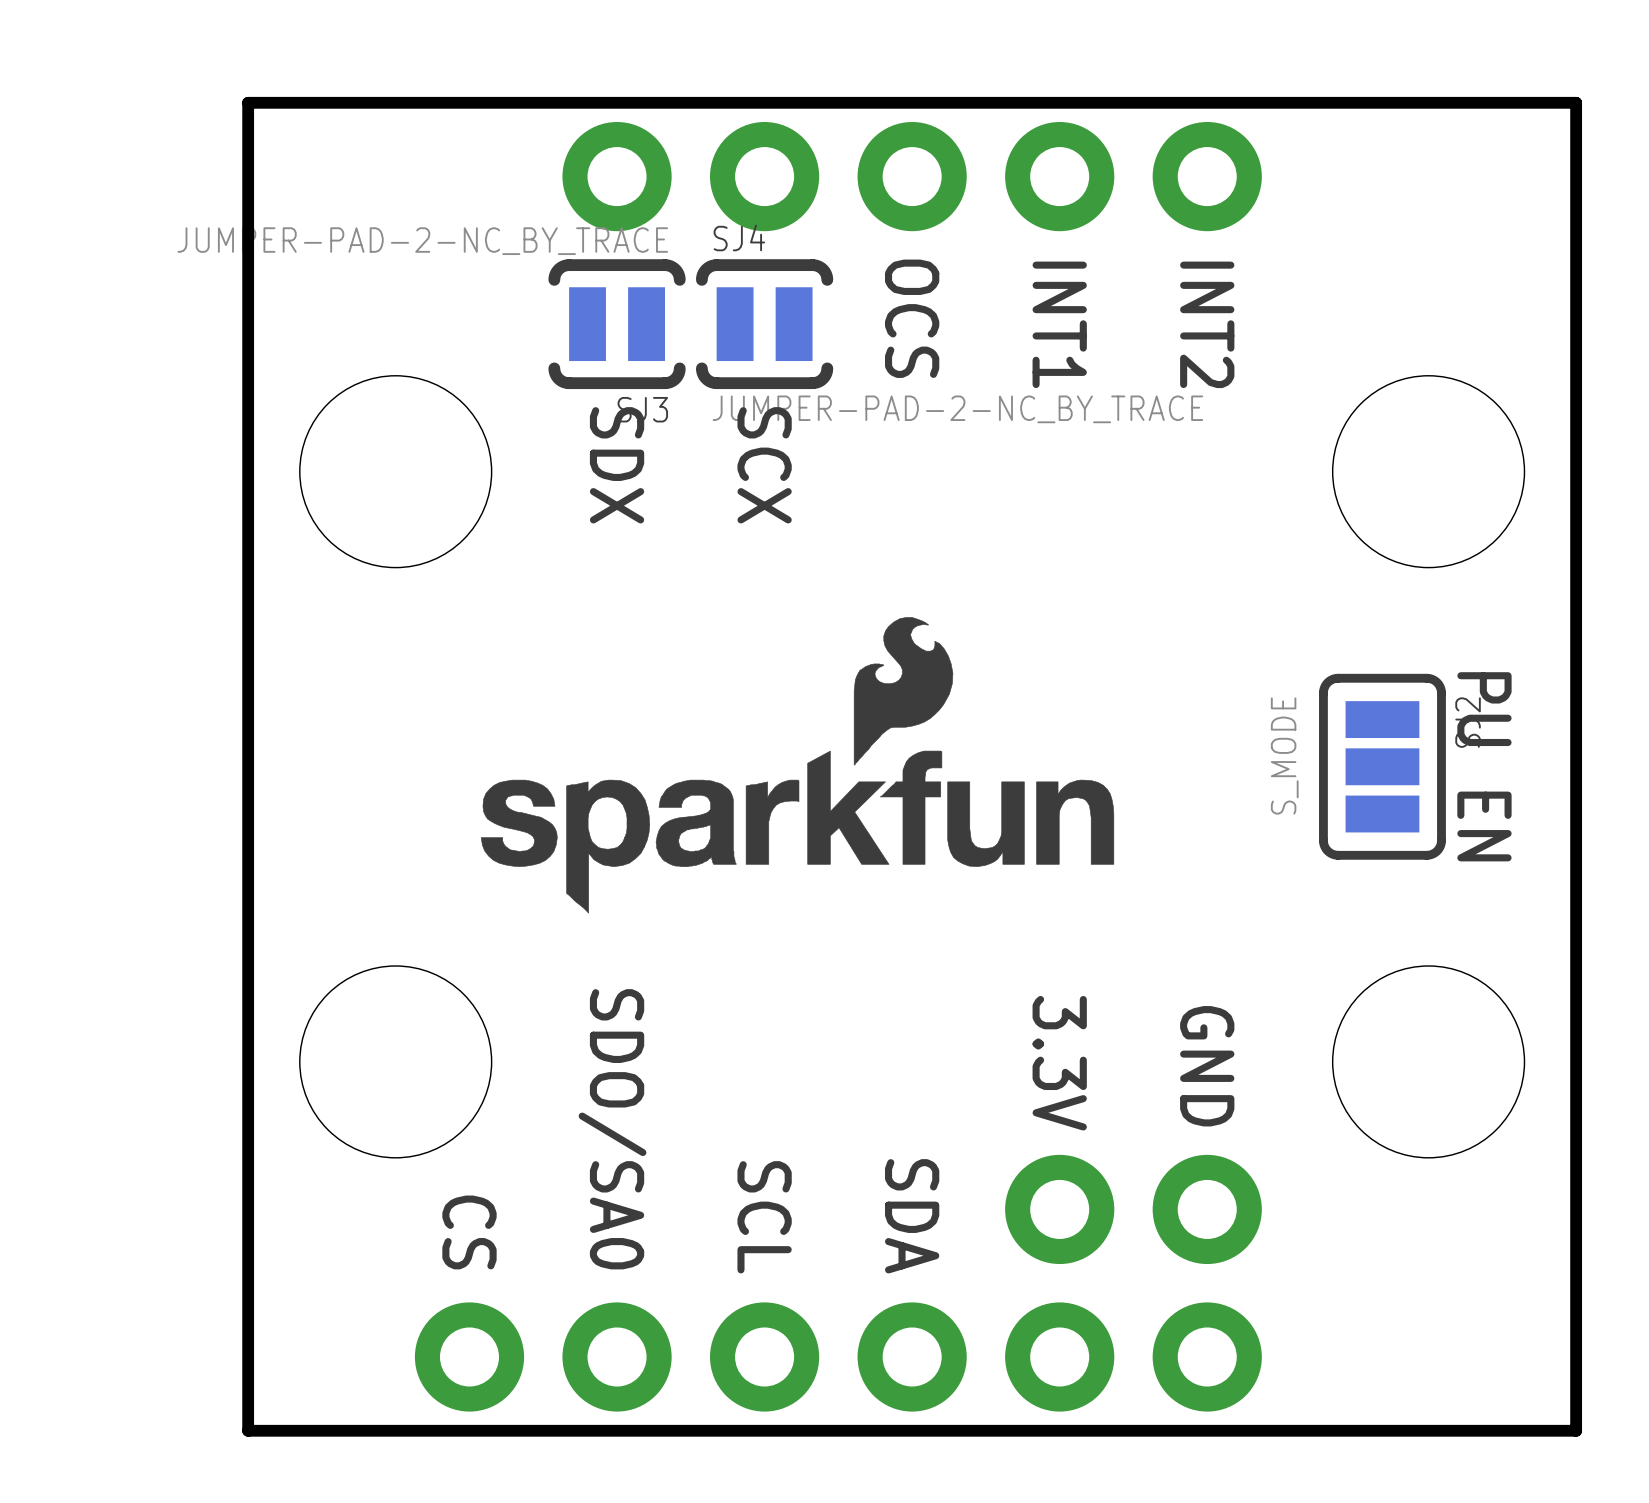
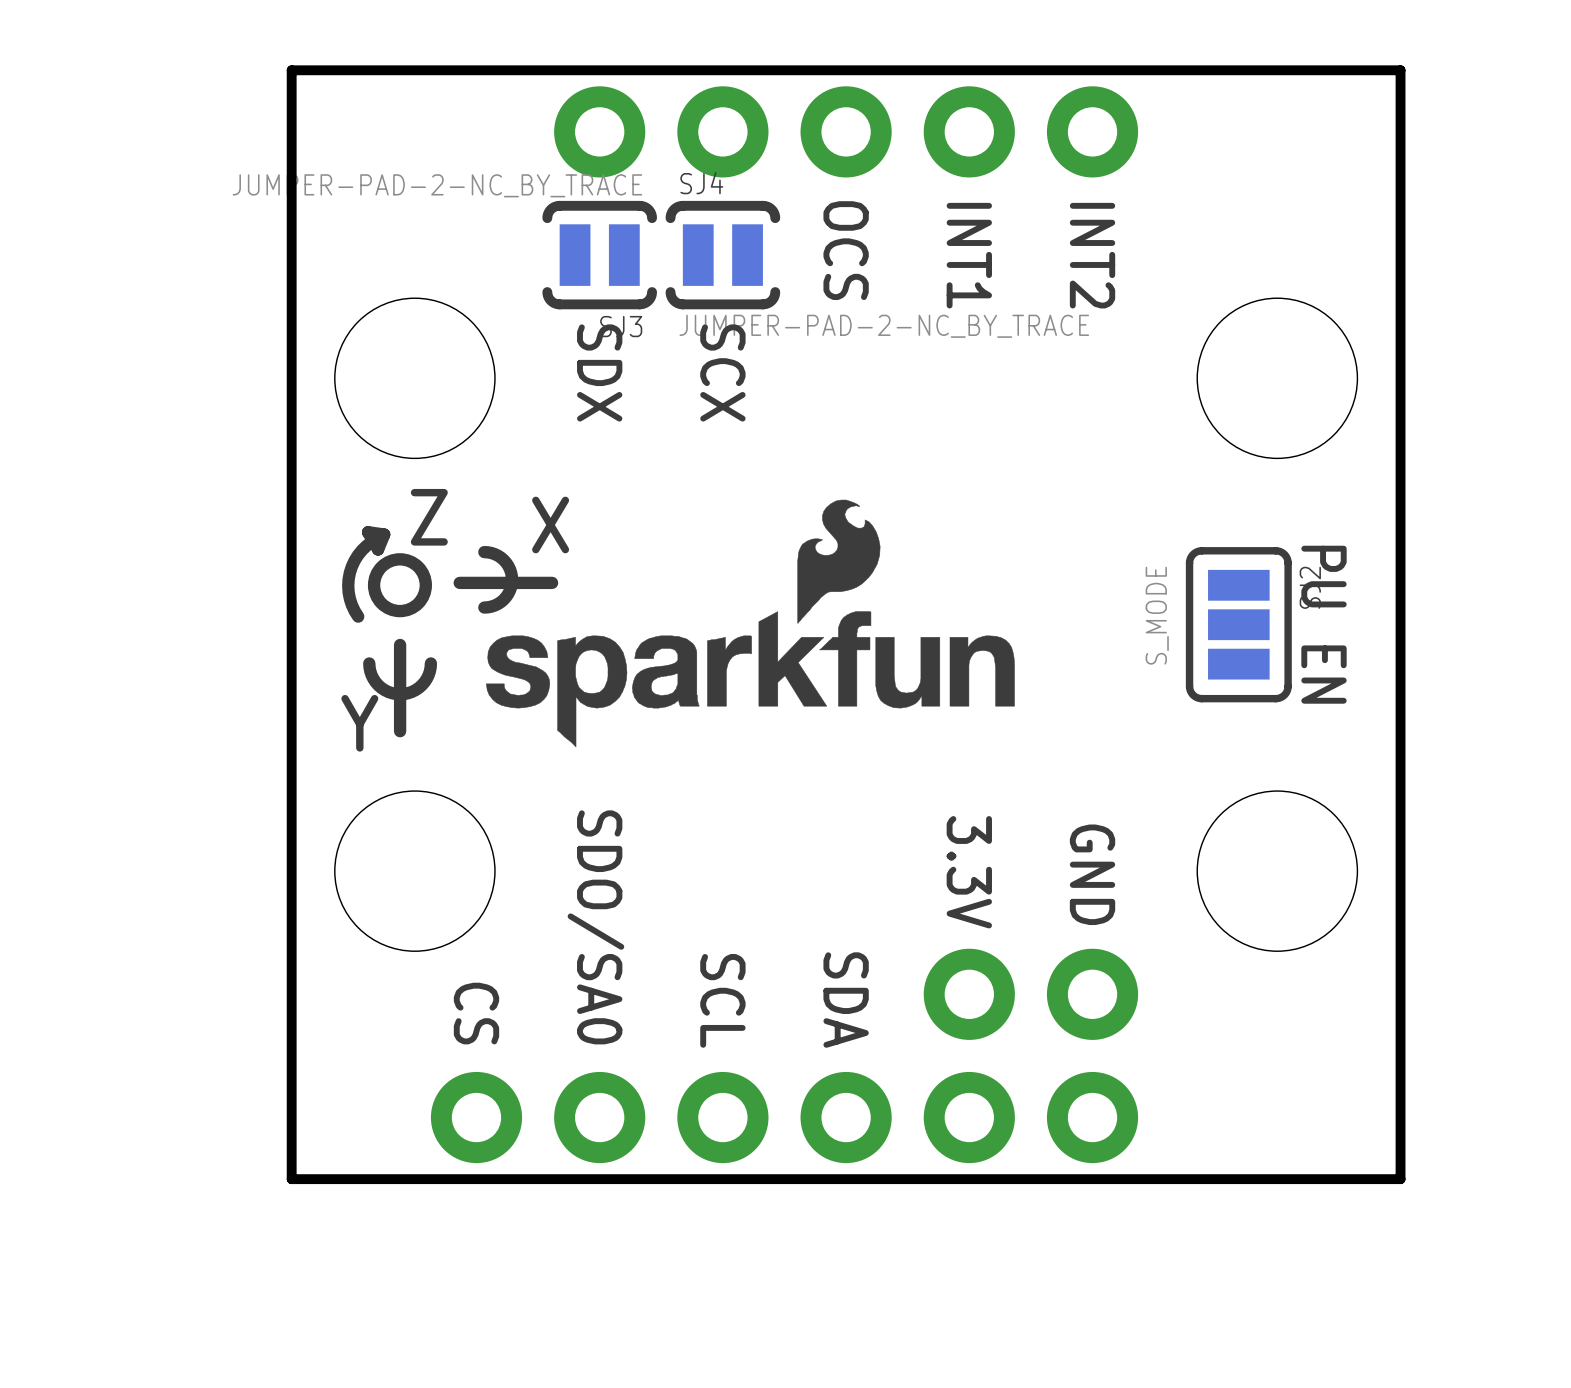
text: none -> Z (429, 517)
text: none -> X (550, 524)
line: none -> (368, 532) (384, 534) (378, 549) (368, 532)
line: none -> (377, 538) (366, 545) (358, 555) (349, 572) (348, 592) (351, 605) (358, 616)
line: none -> (484, 552) (494, 554) (503, 560) (509, 569) (512, 579) (509, 590) (503, 599) (494, 605) (484, 607)
drawing: none -> [367, 553, 432, 618]
line: none -> (552, 582) (459, 582)
line: none -> (400, 644) (400, 731)
line: none -> (430, 663) (428, 675) (421, 685) (411, 691) (400, 694) (388, 691) (378, 685) (371, 675) (369, 663)
text: none -> Y (359, 723)

